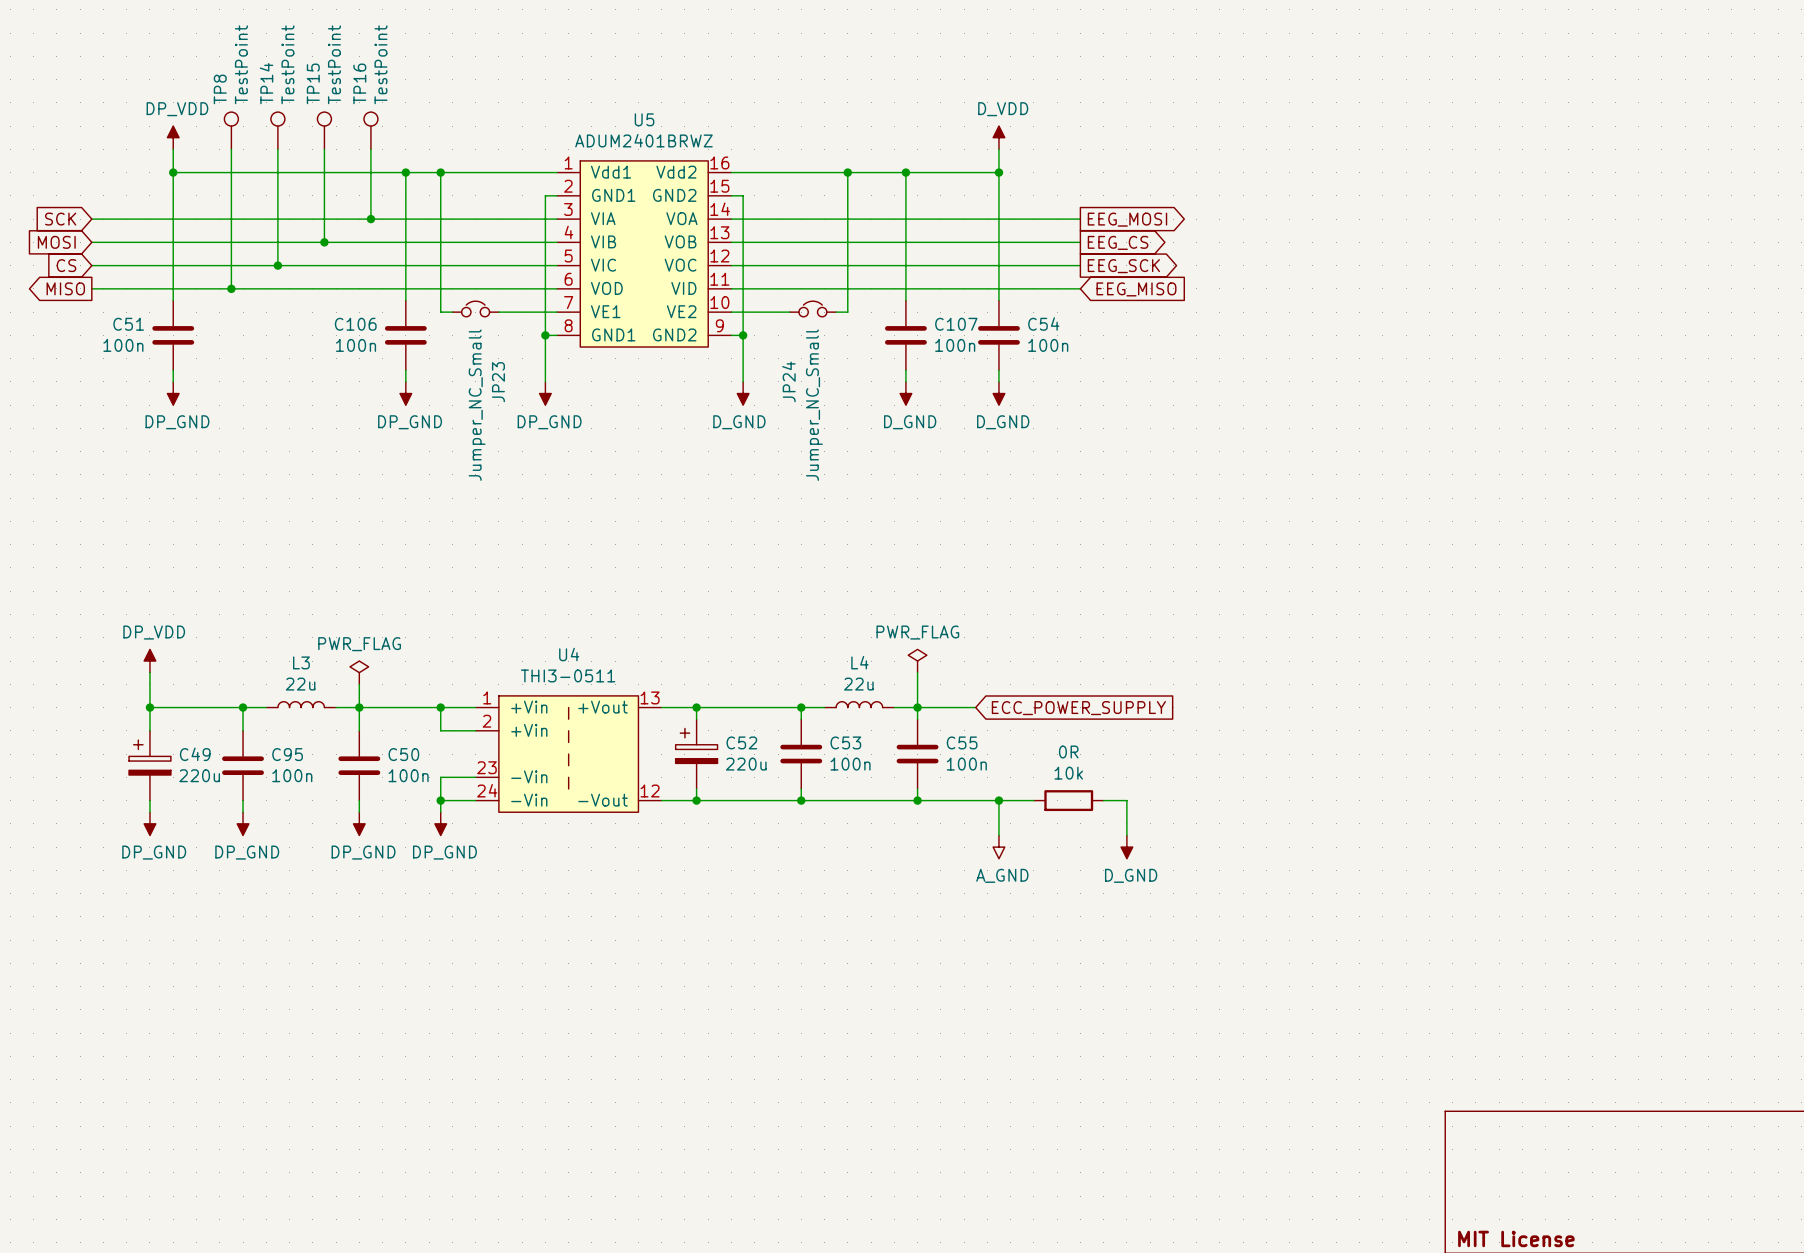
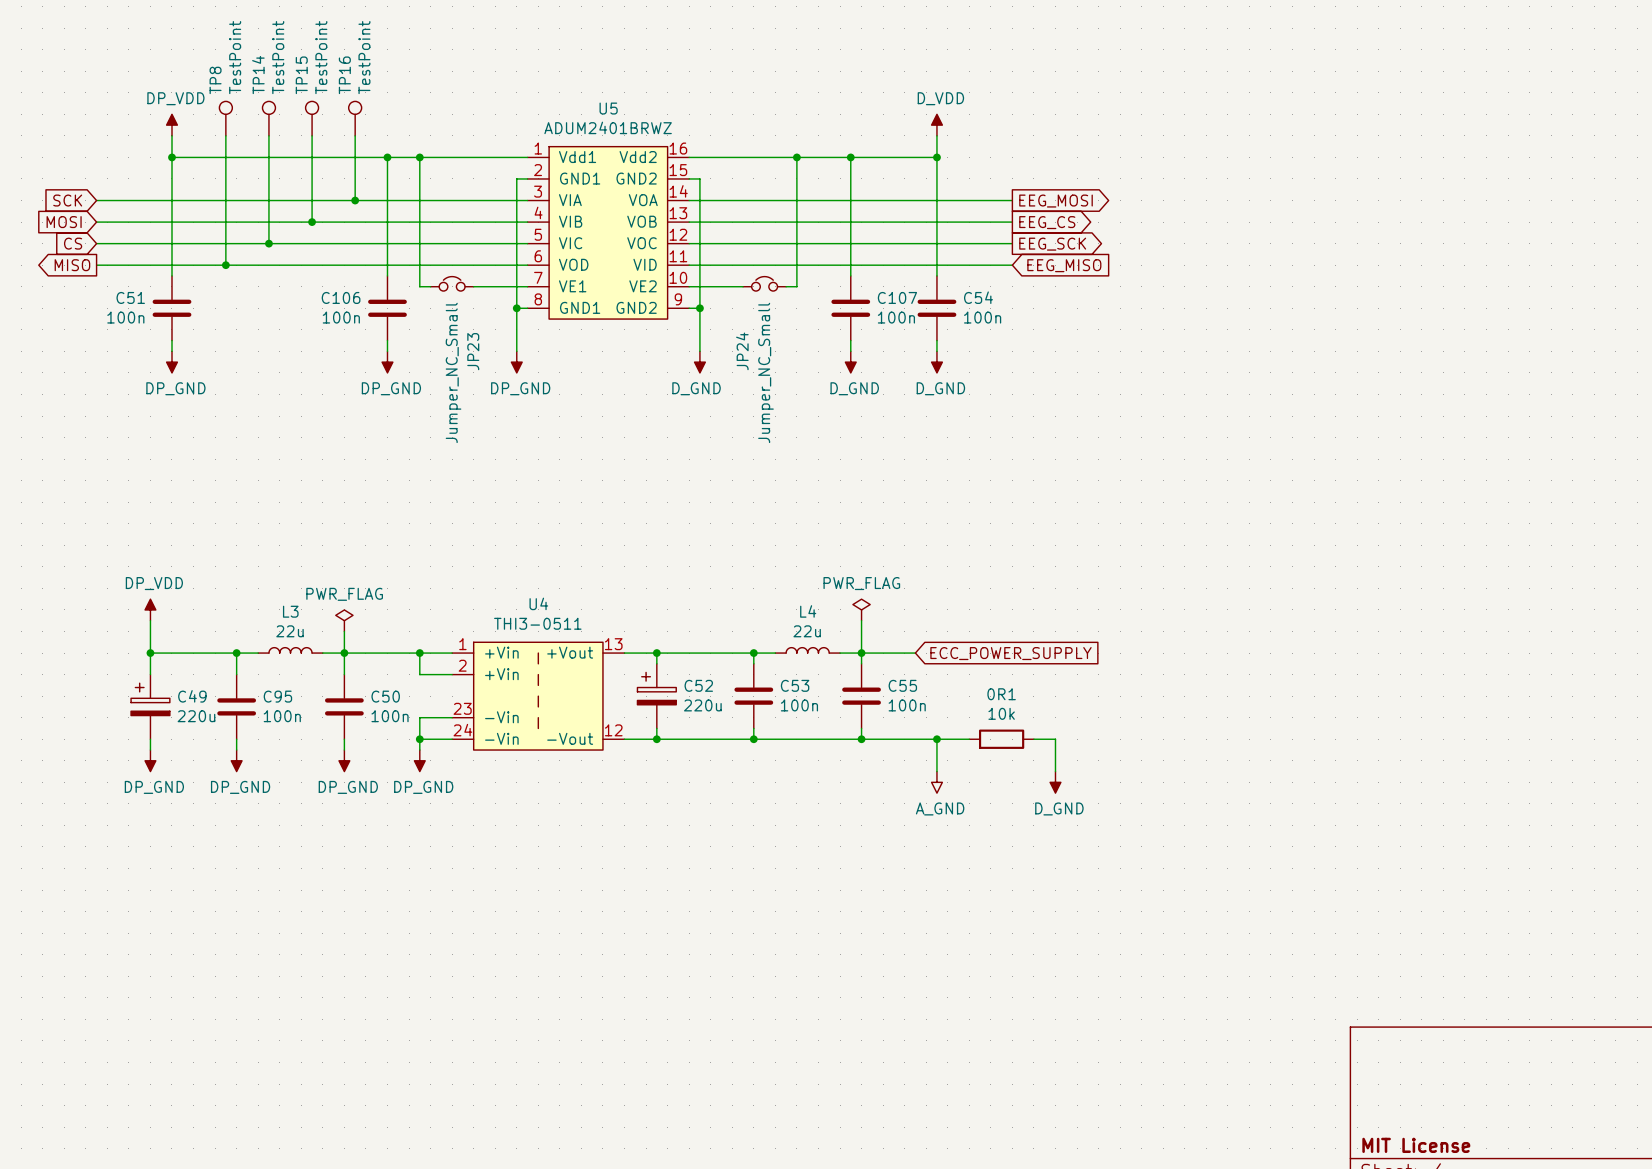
0R name: 0R (1068, 752) -> 0R1 (1001, 694)

